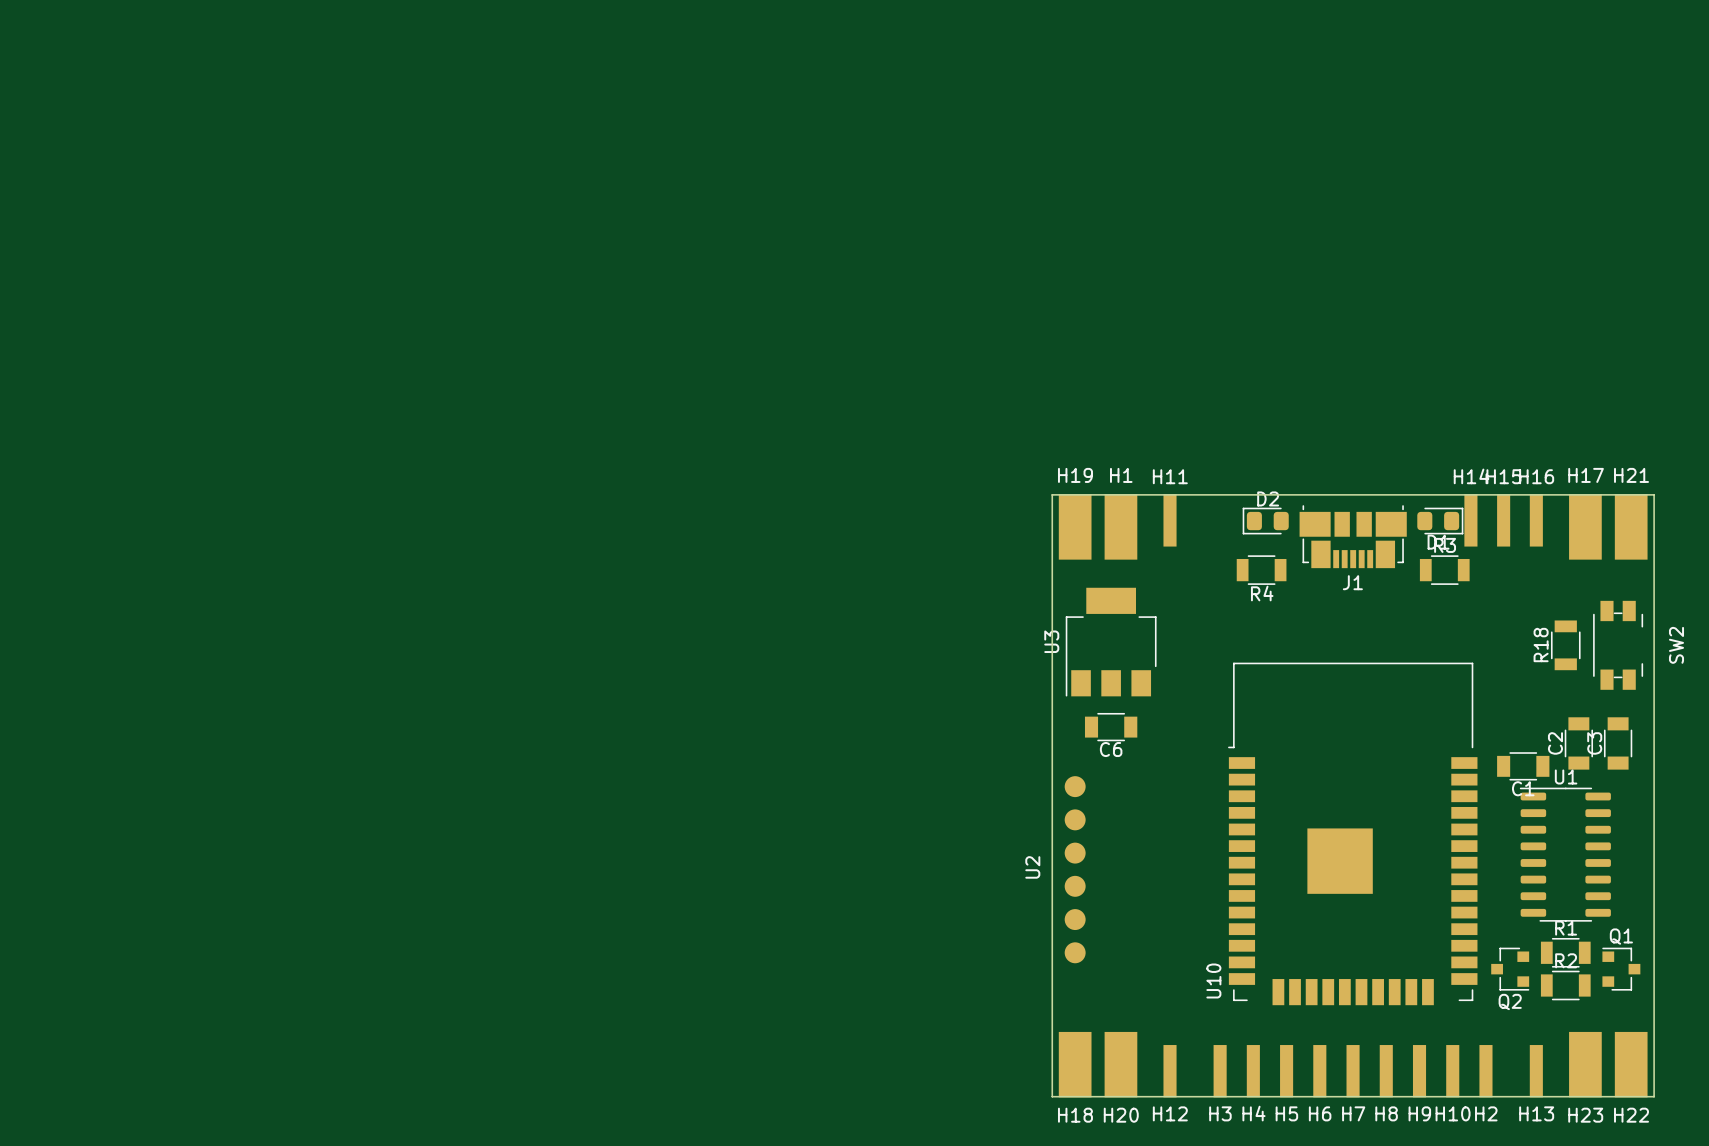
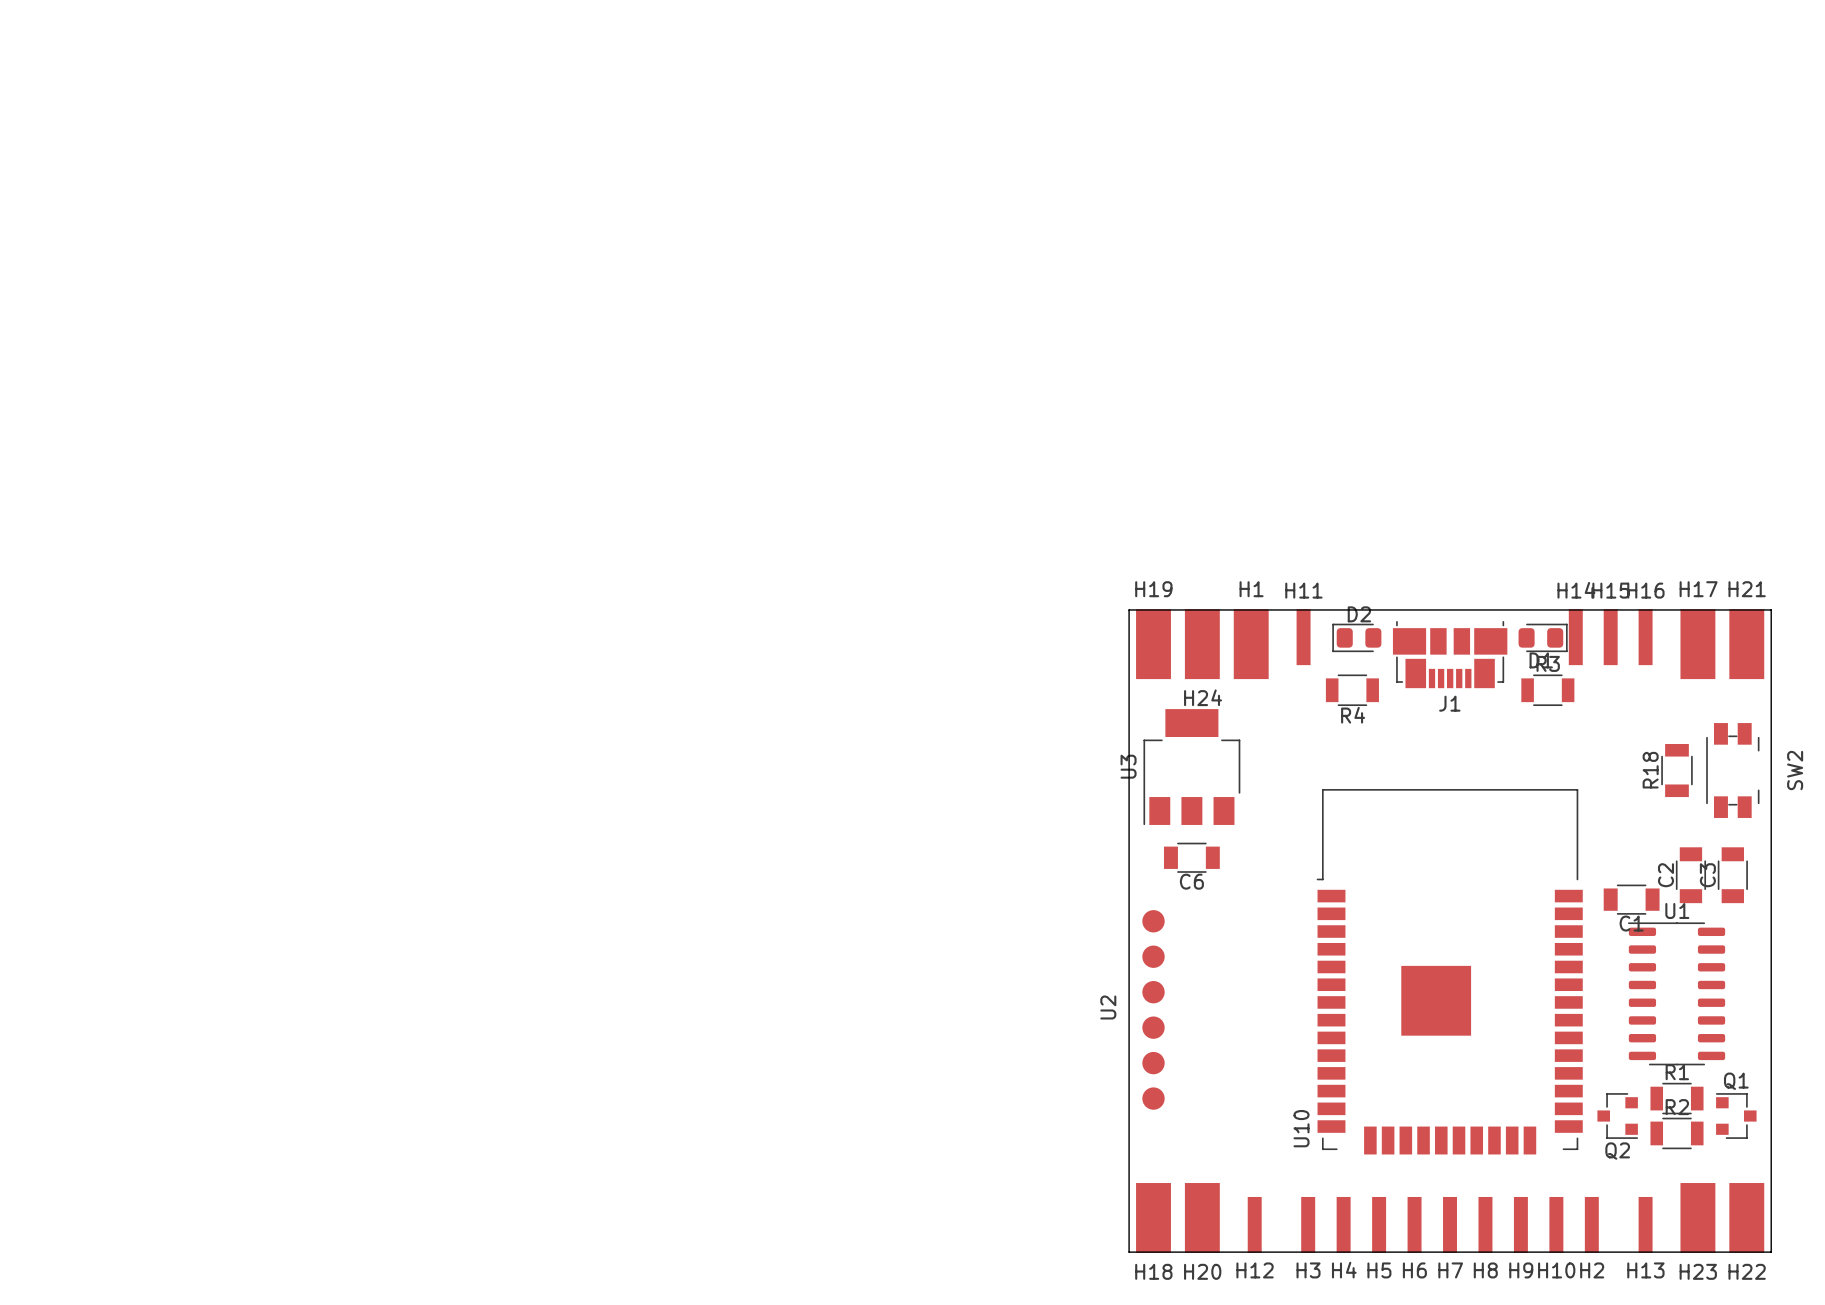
H1 name: H1 (1121, 475) -> H24 (1203, 697)
H11 position: (1170, 520) -> (1303, 637)
H1: none -> (1251, 644)

